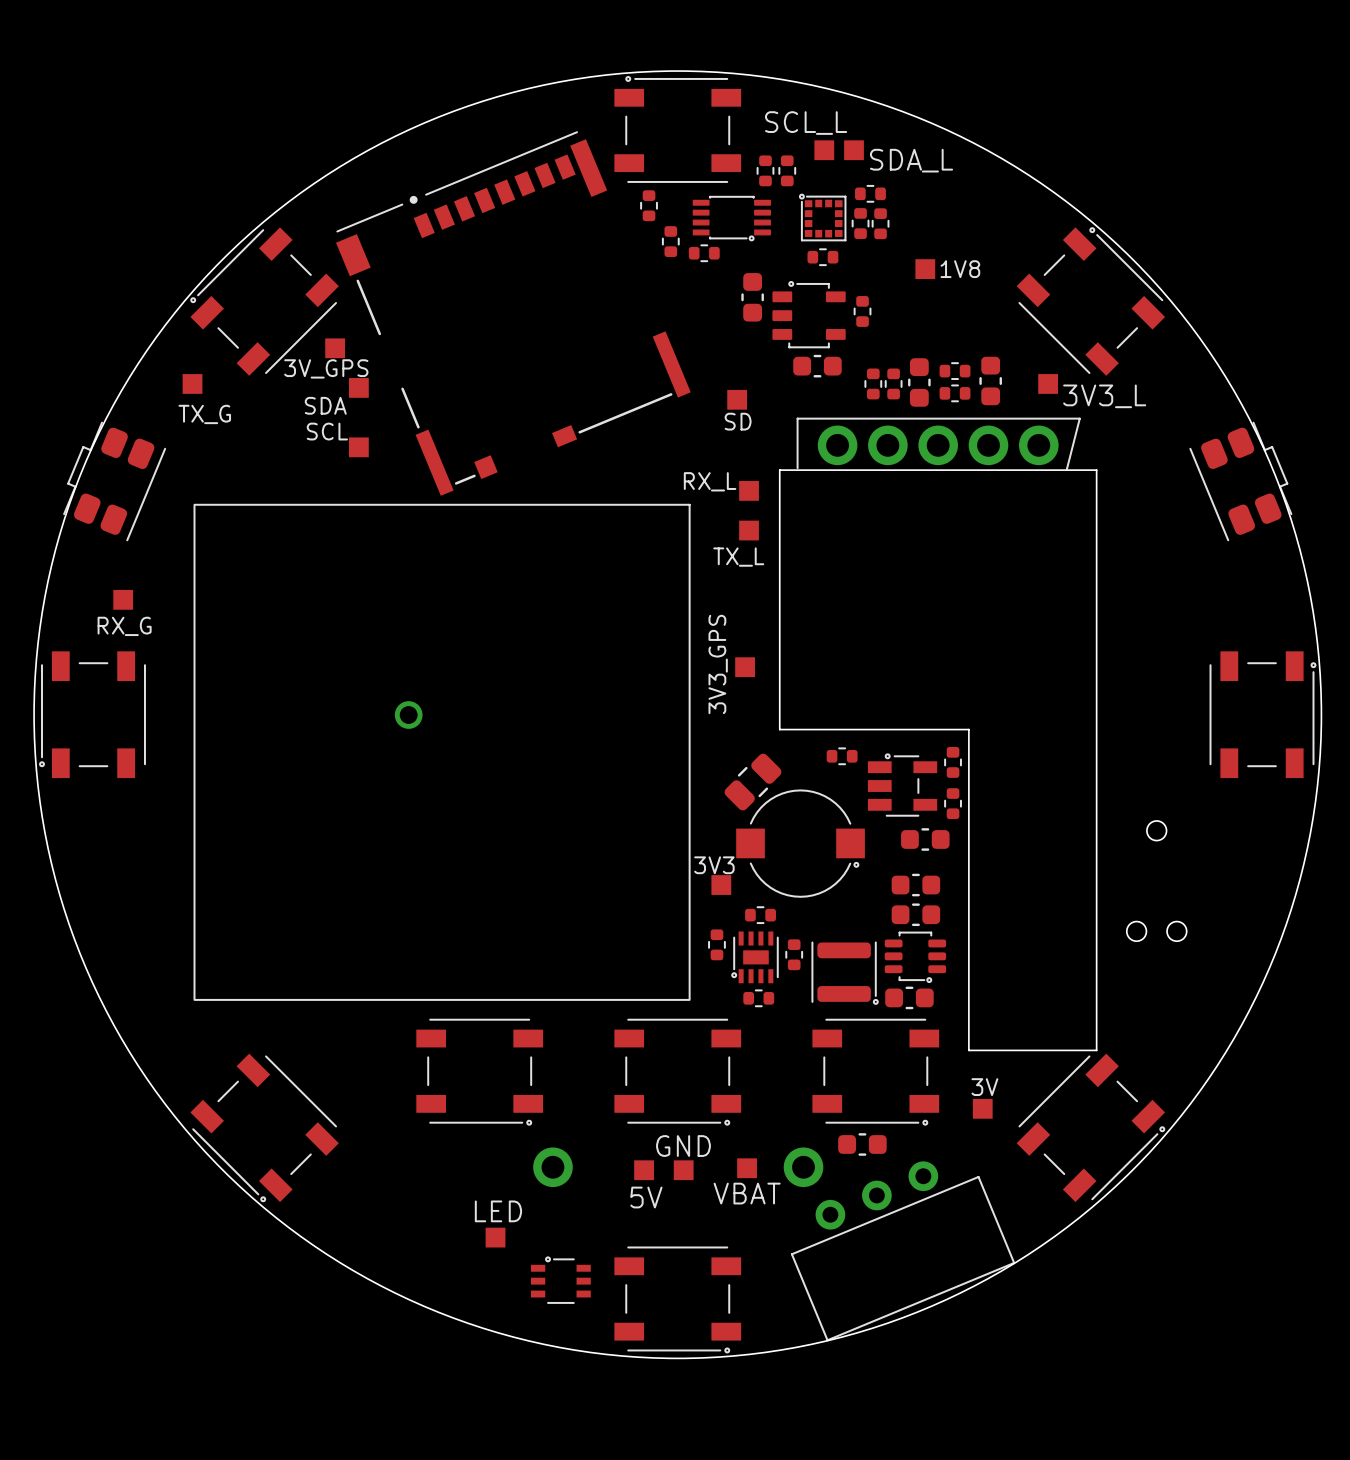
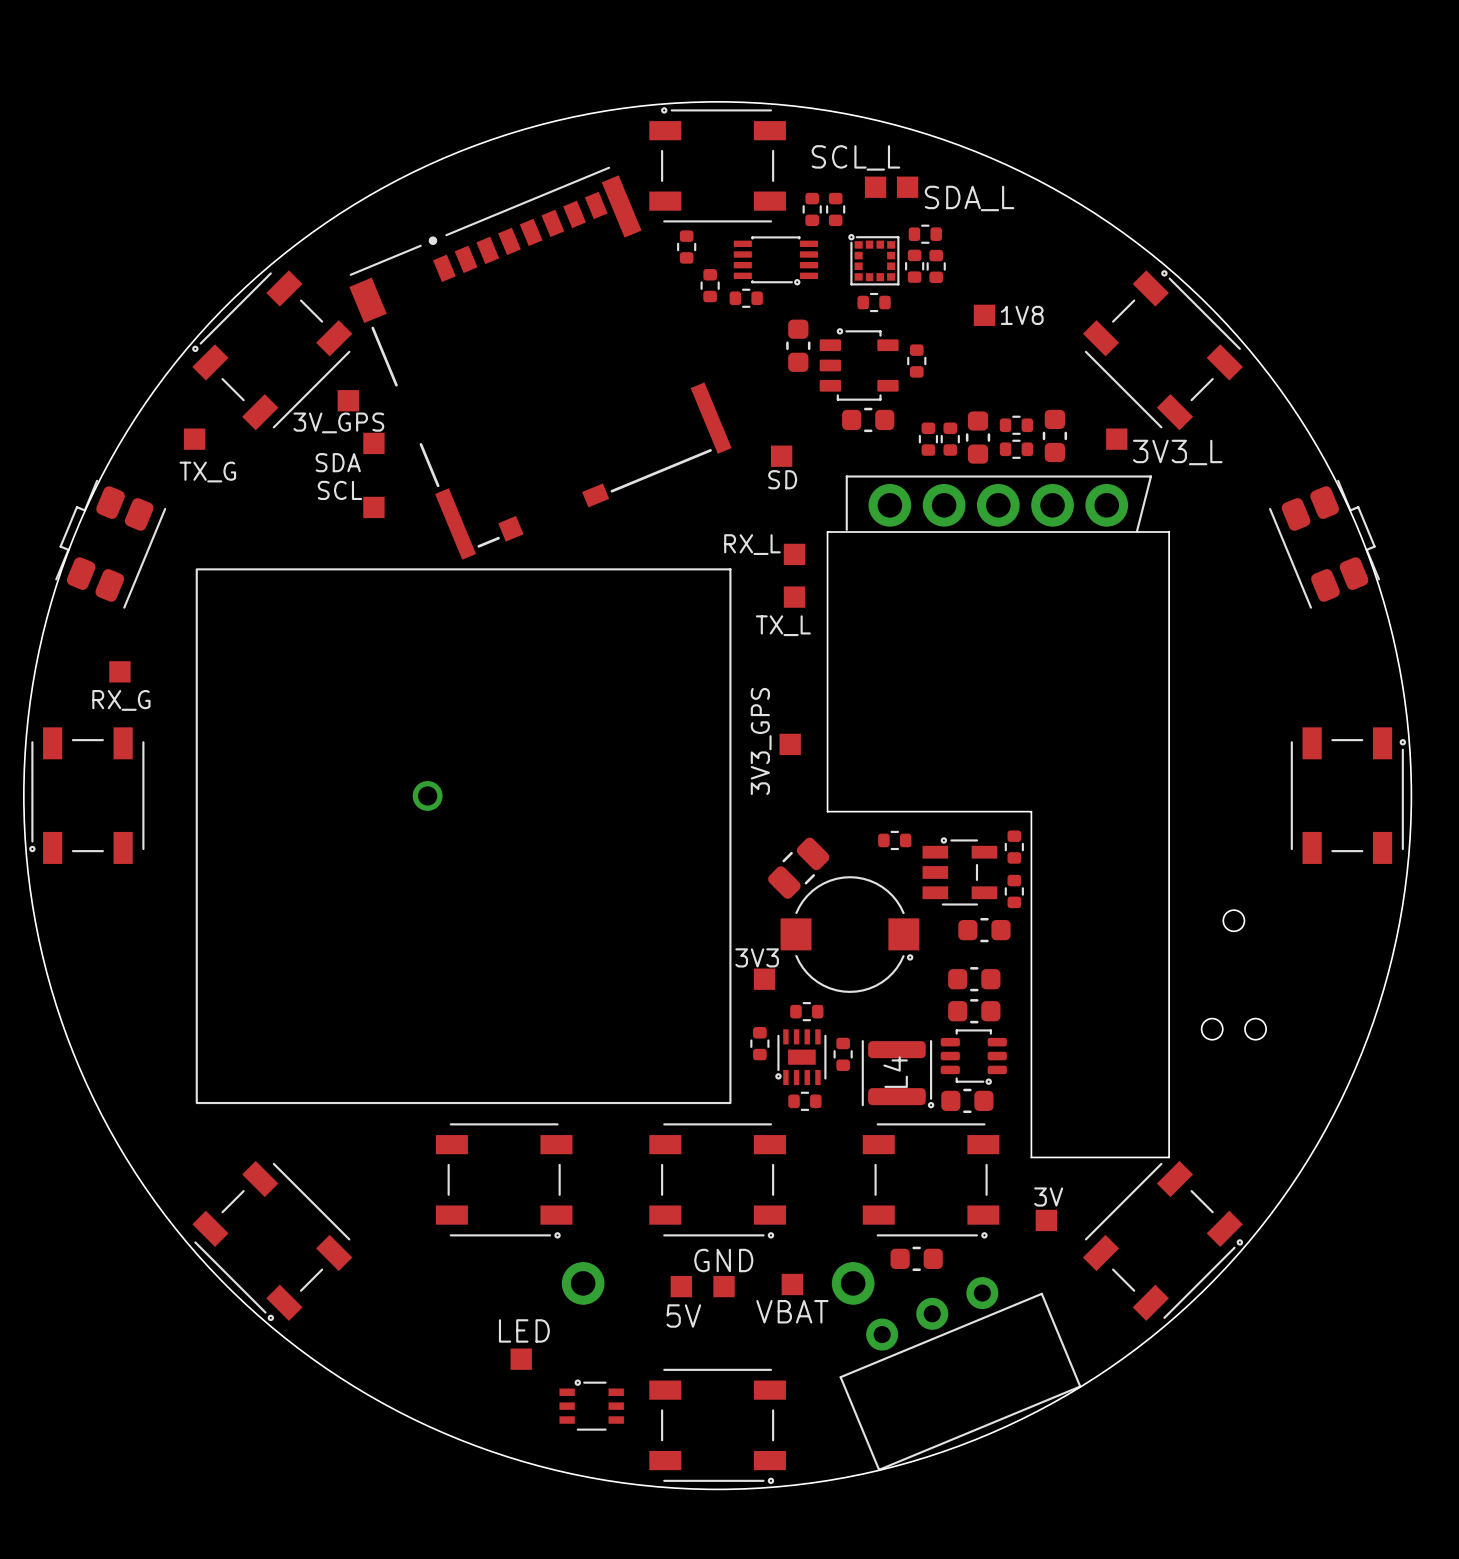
L4 name: none -> L4 (895, 1072)

